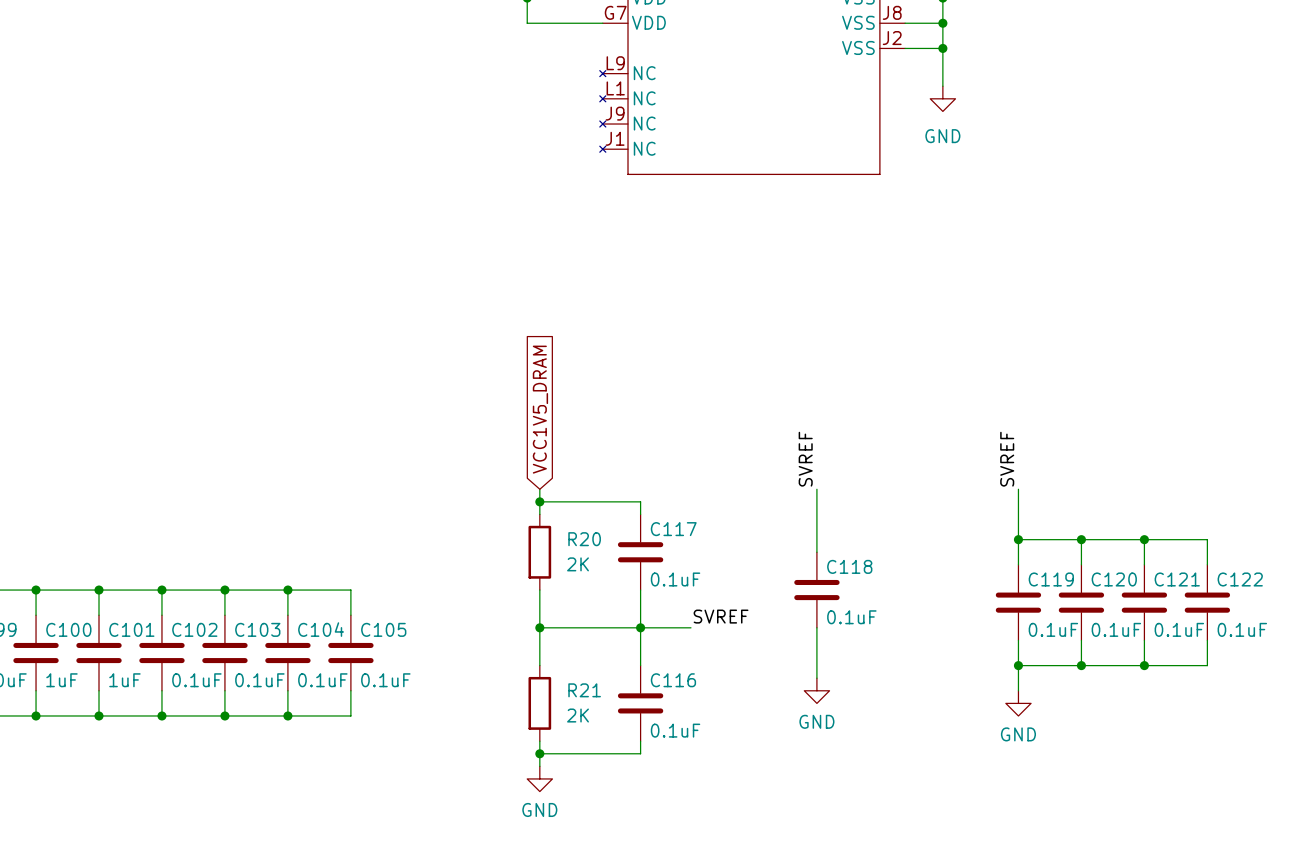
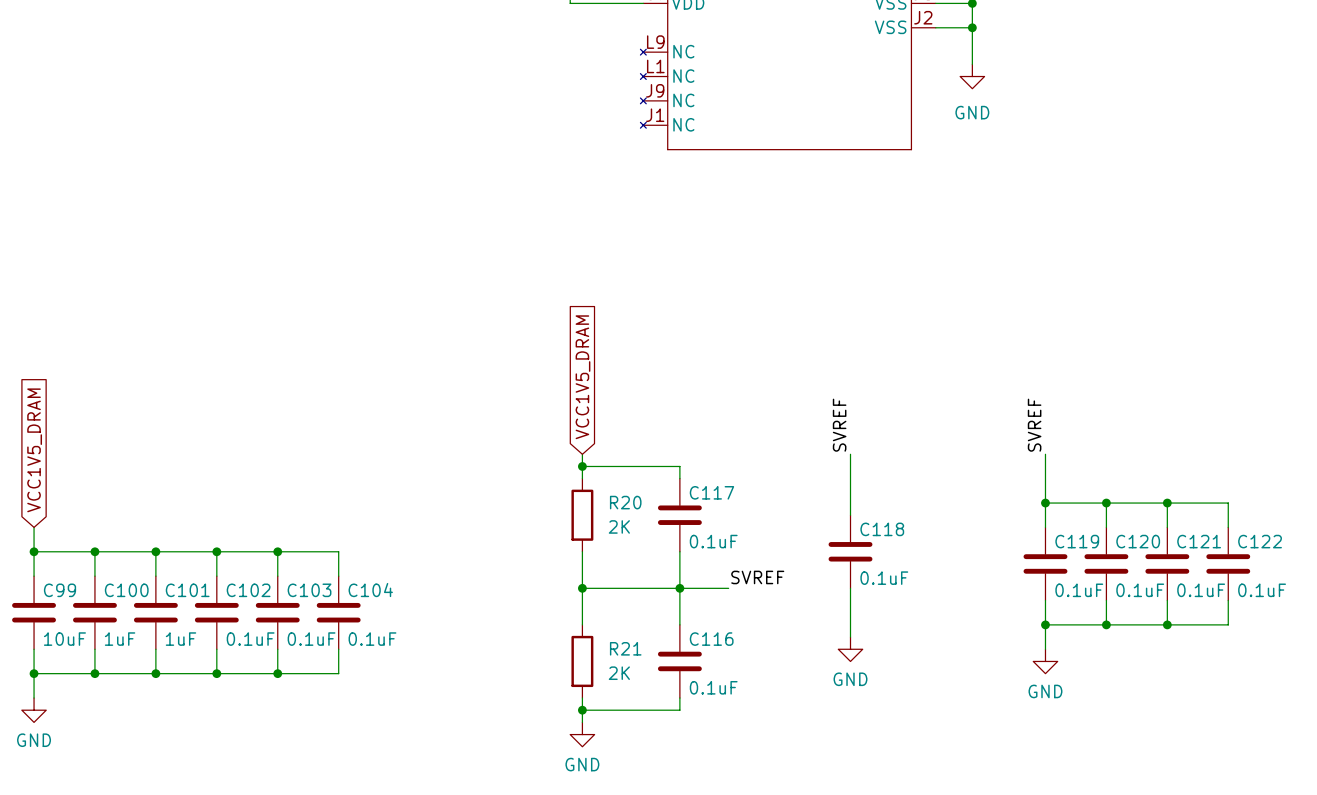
wire: (287, 590) (350, 590) (350, 615) -> none
junction: (287, 590) -> none
C105: 0.1uF (350, 653) -> none
wire: (350, 690) (350, 715) (287, 715) -> none
junction: (287, 715) -> none

